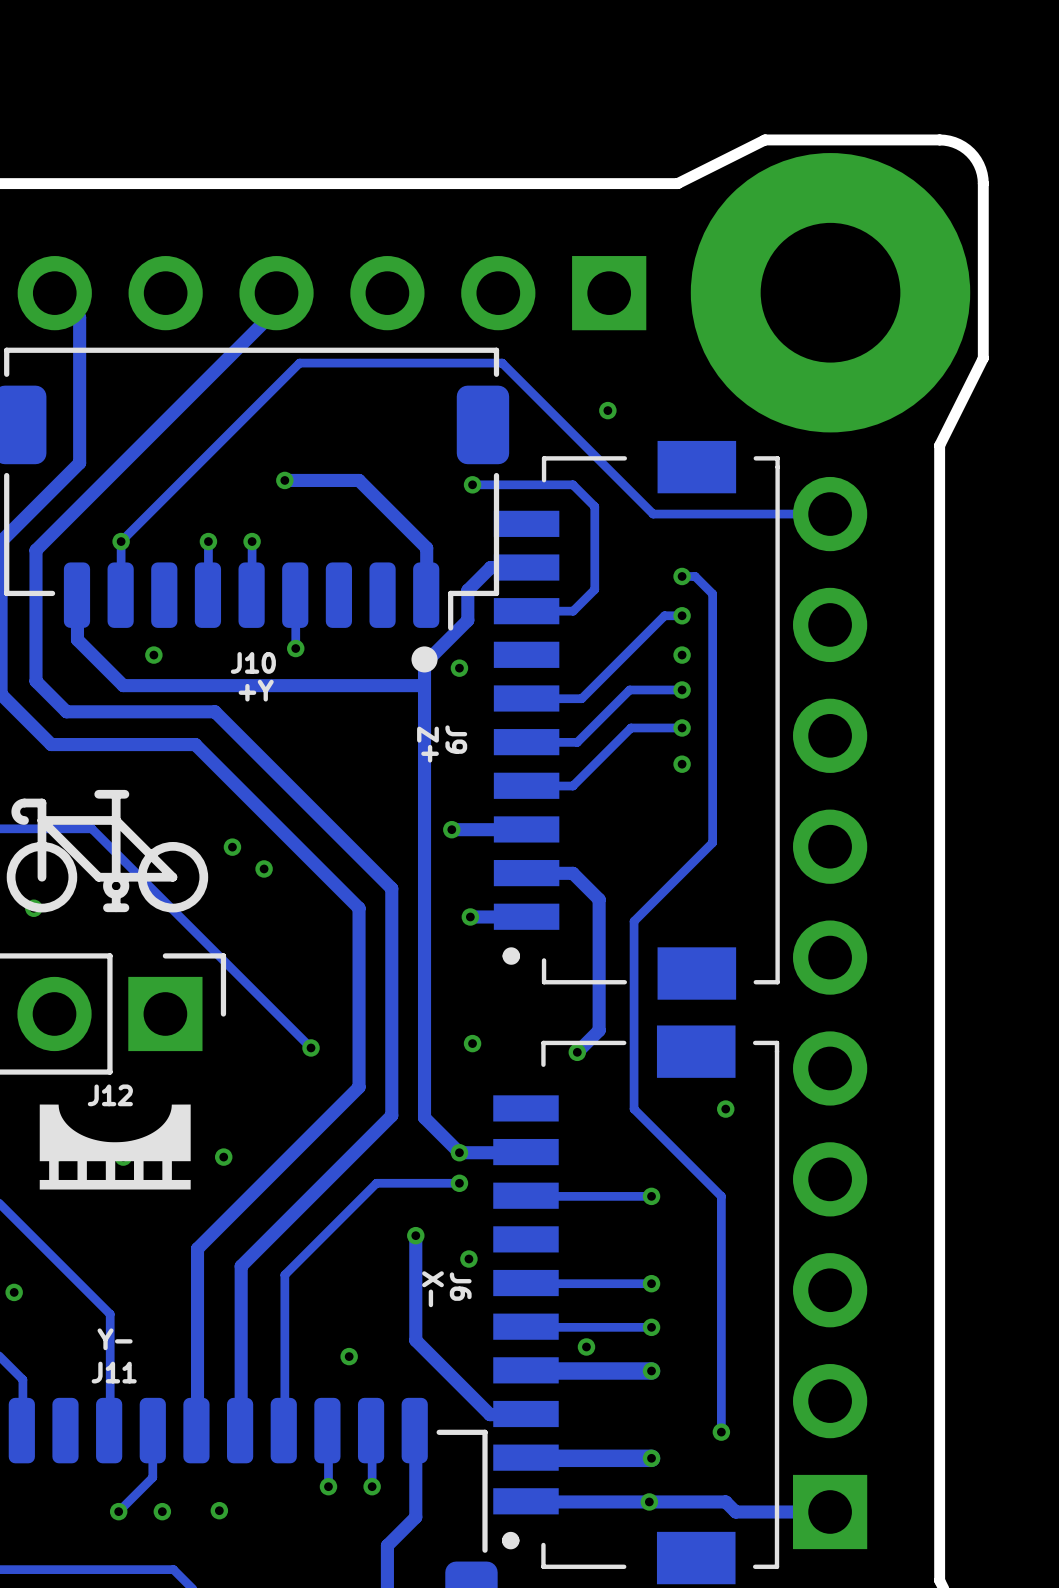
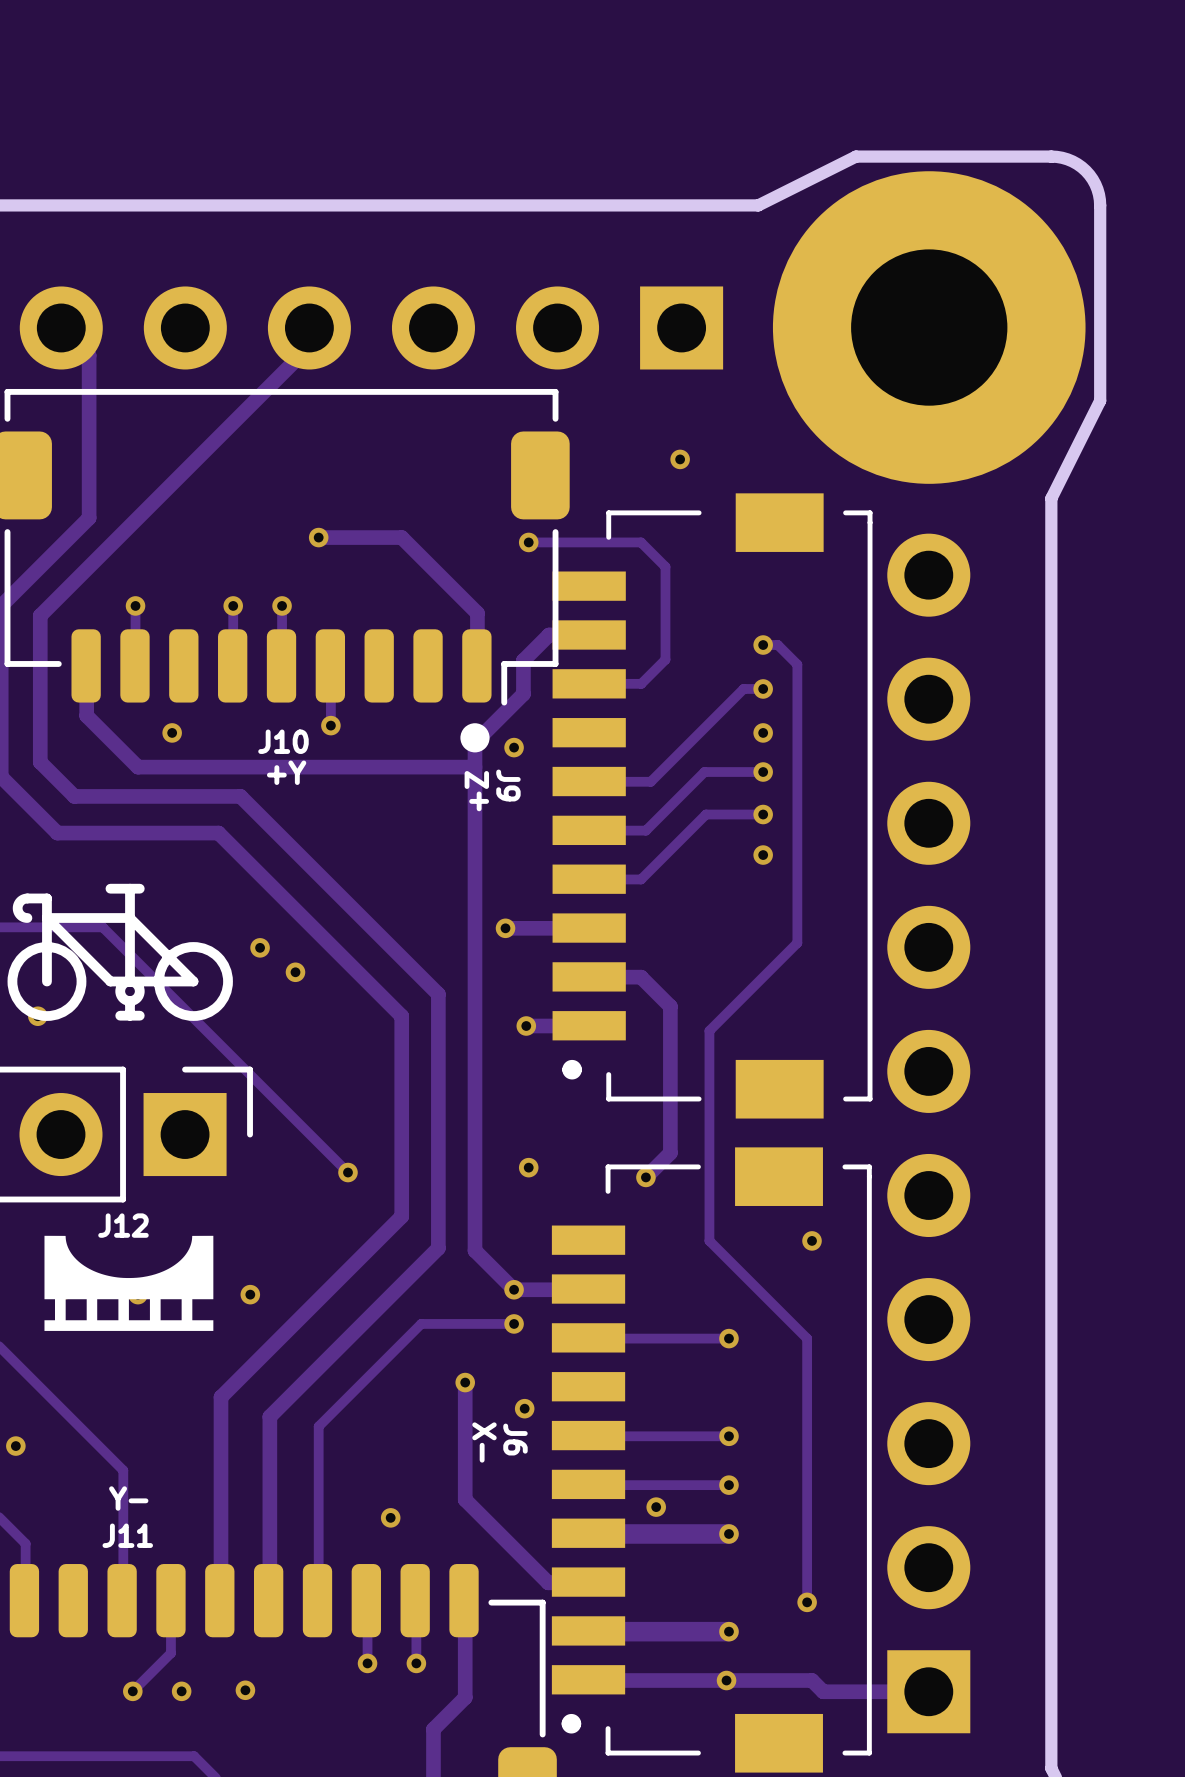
track: (830, 514) (653, 514) (502, 363) (299, 363) (121, 541) -> none
J9 name position: J9 (456, 739) -> J9 (508, 785)
text position: +Z (427, 744) -> +Z (476, 791)

